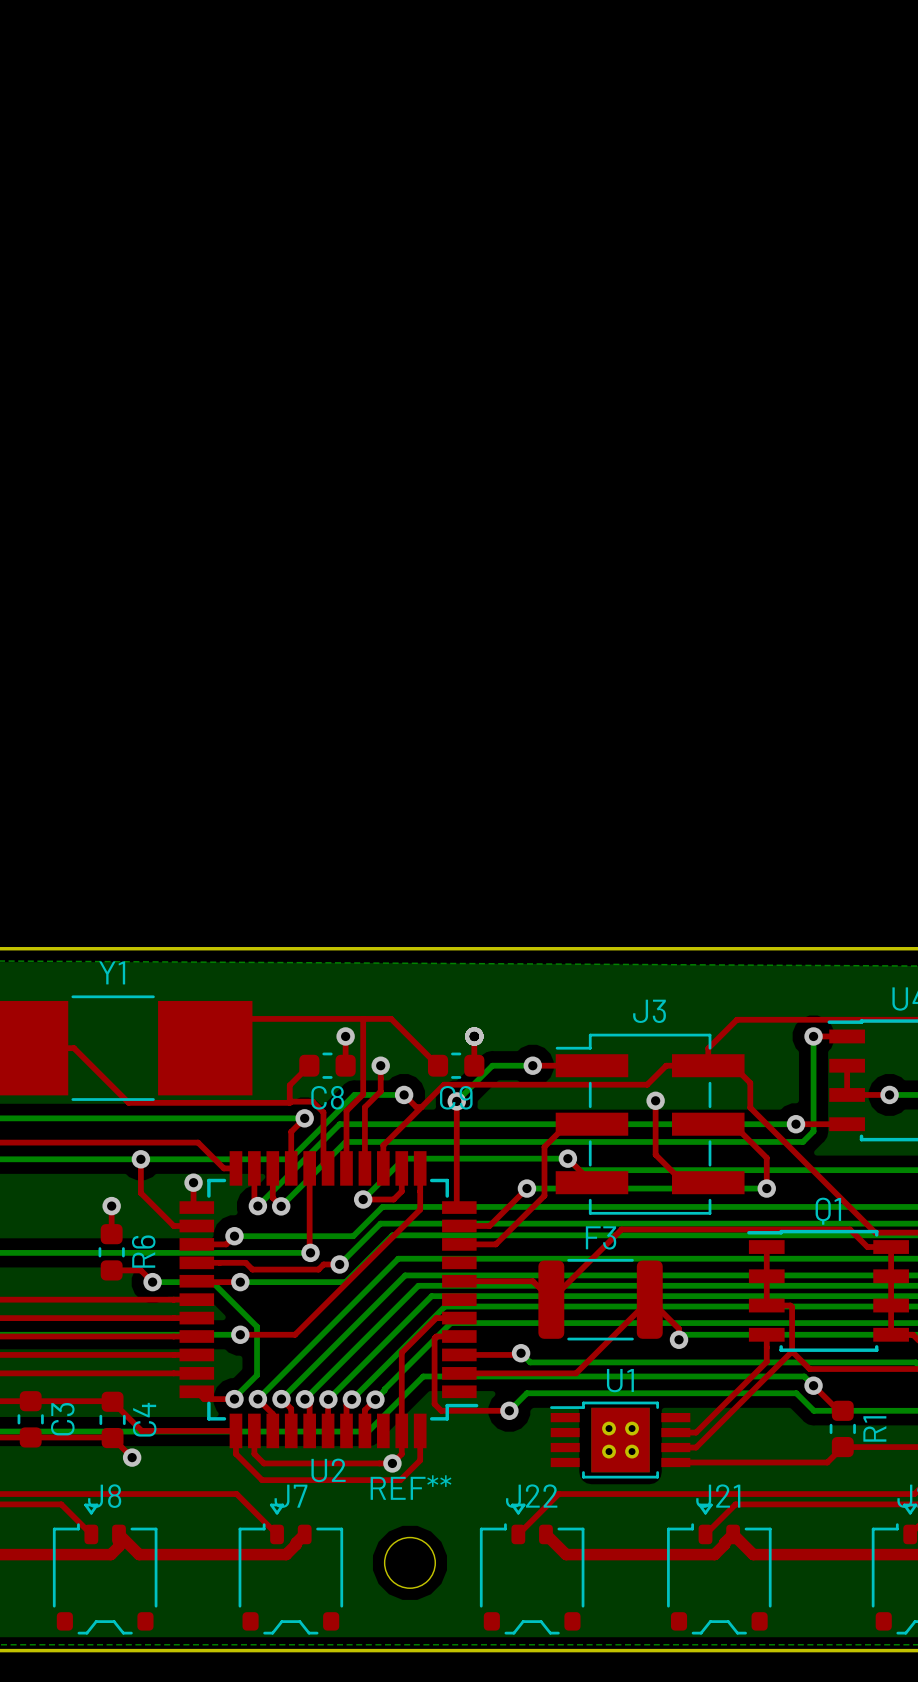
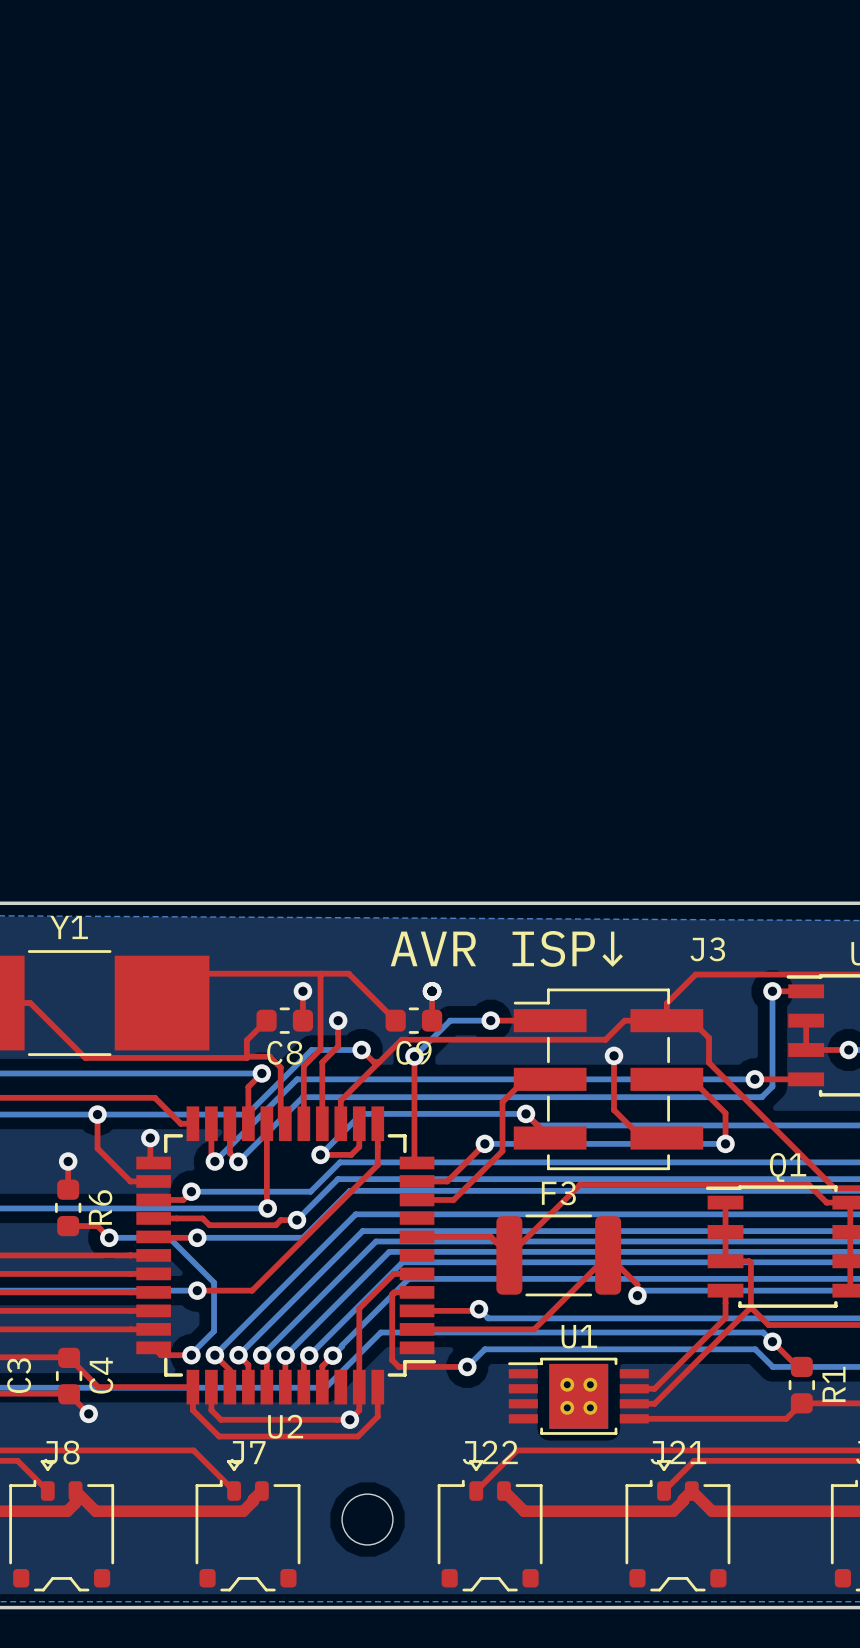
text: none -> AVR ISP↓ (506, 948)
J3 name position: J3 (649, 1011) -> J3 (707, 949)
REF** name: REF** (410, 1487) -> none

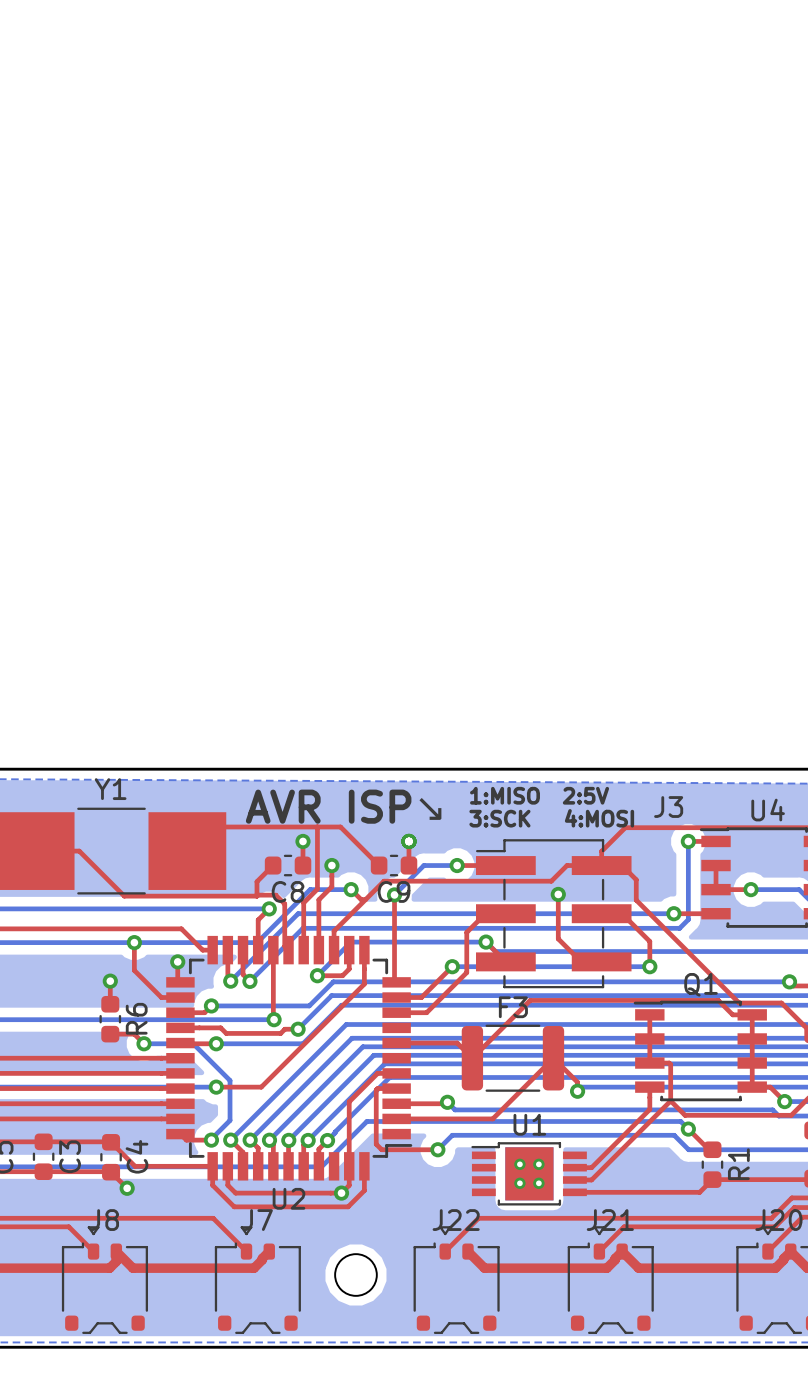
text: none -> 1:MISO 2:5V (539, 795)
text: AVR ISP↓ (506, 948) -> AVR ISP↘ (345, 806)
J3 name position: J3 (707, 949) -> J3 (668, 807)
text: none -> 3:SCK 4:MOSI (551, 818)

